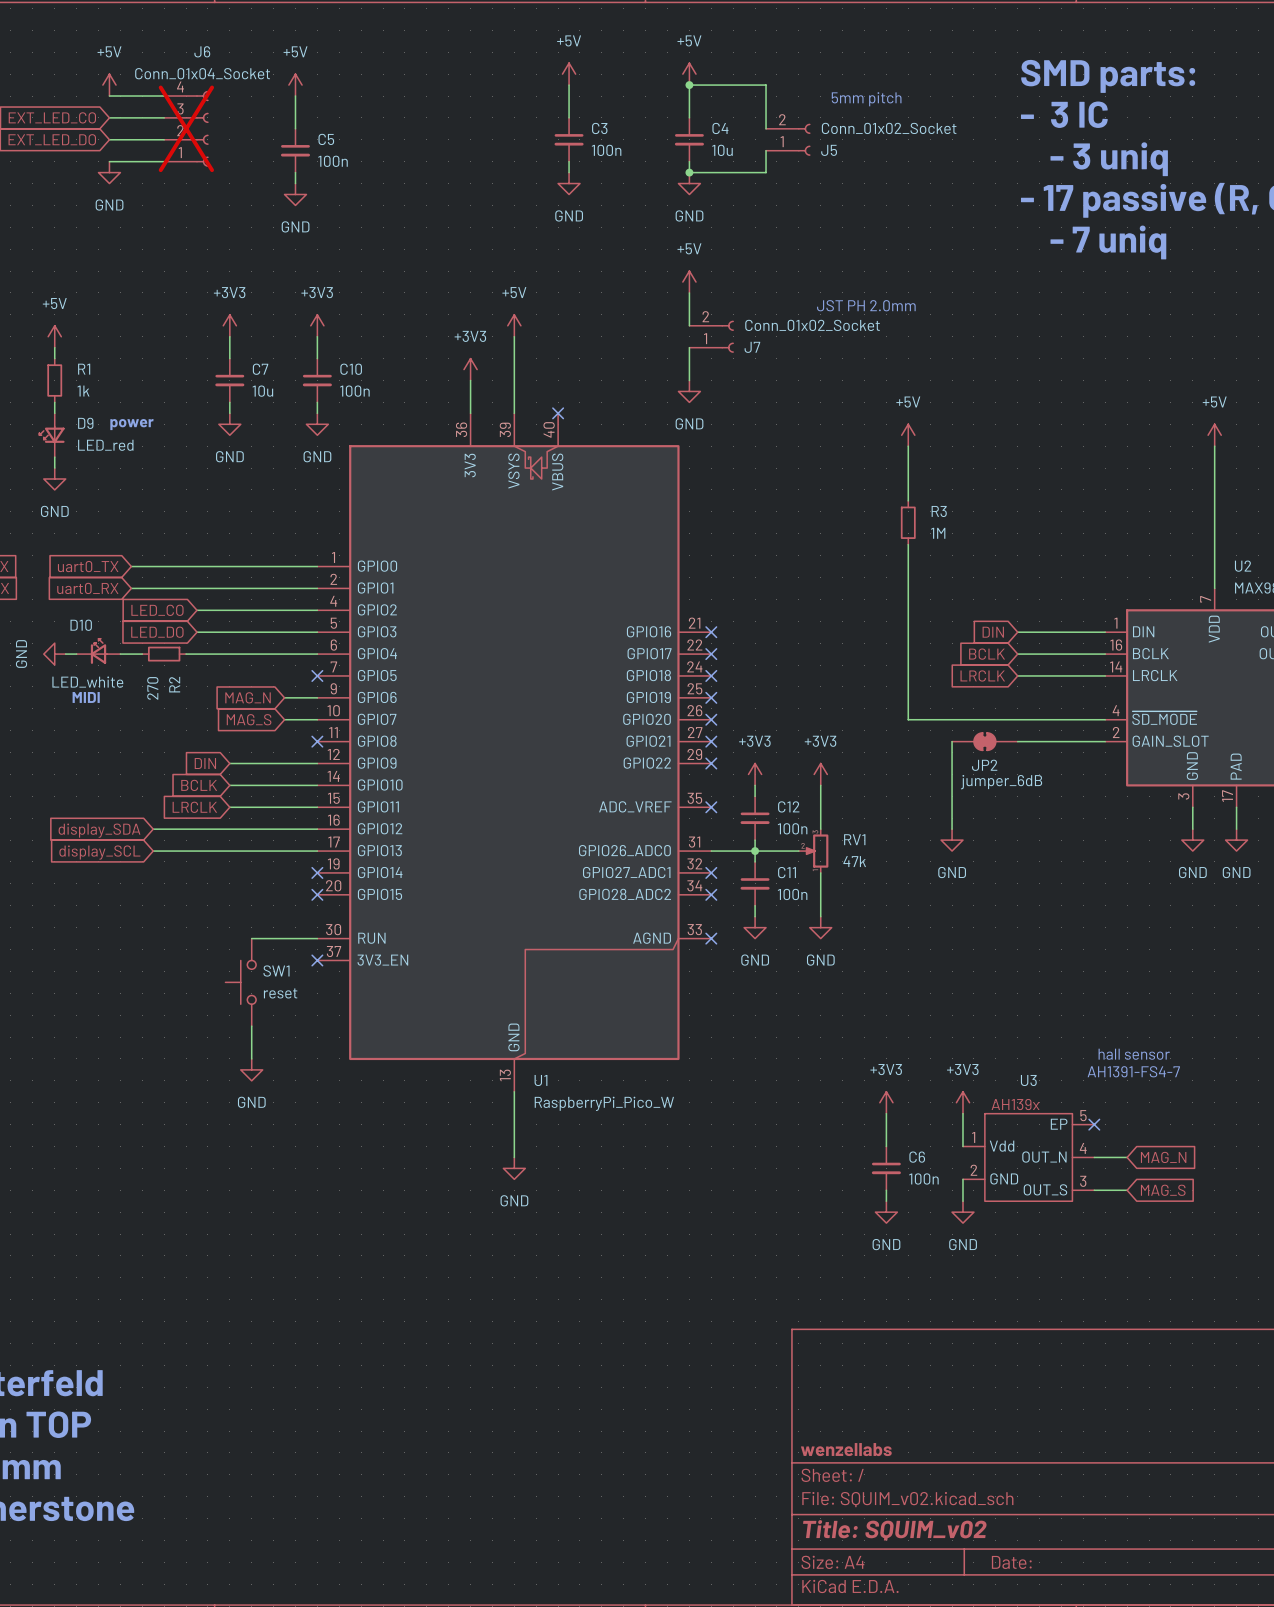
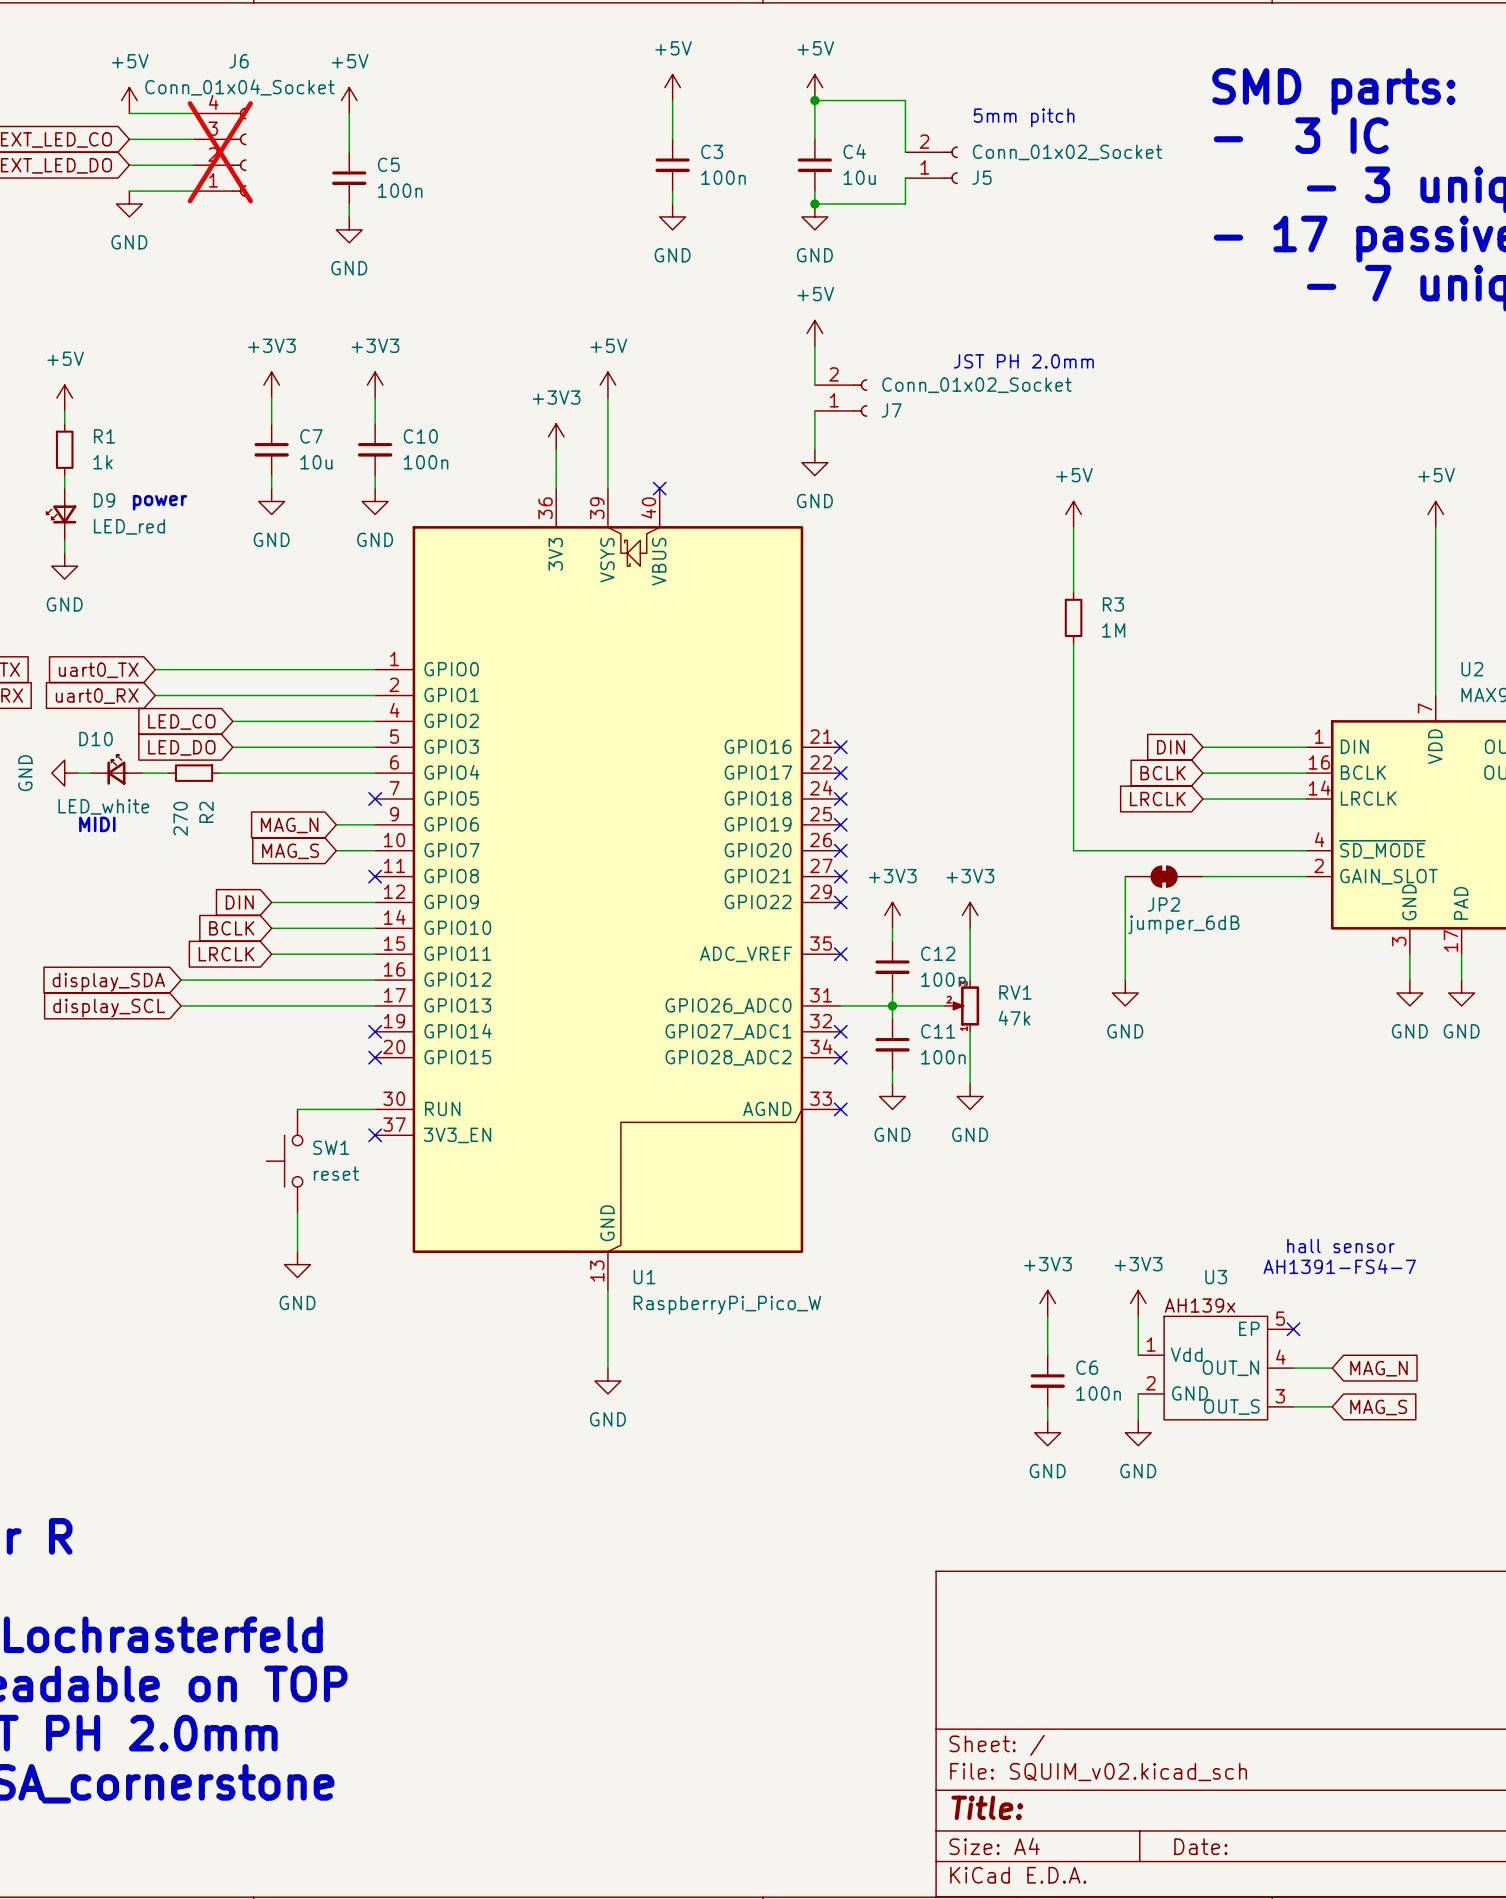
title block: wenzellabs (846, 1449) -> none
title block: Title: SQUIM_v02 (894, 1530) -> Title: (987, 1807)

